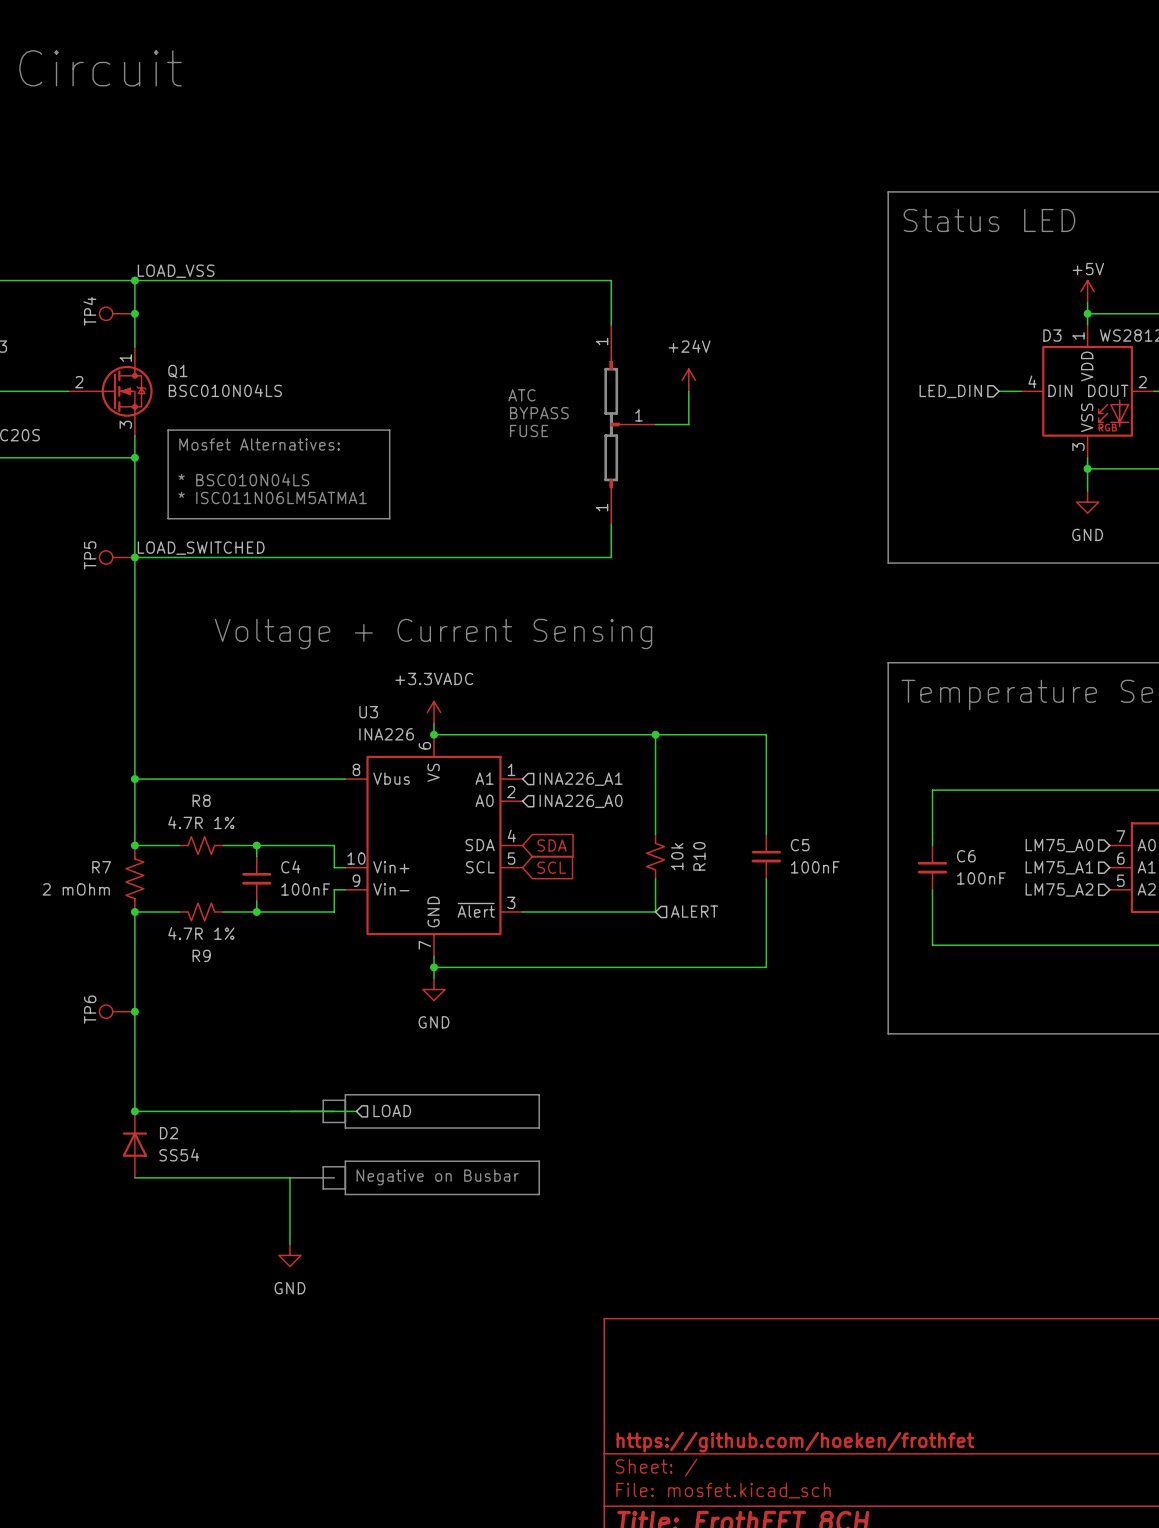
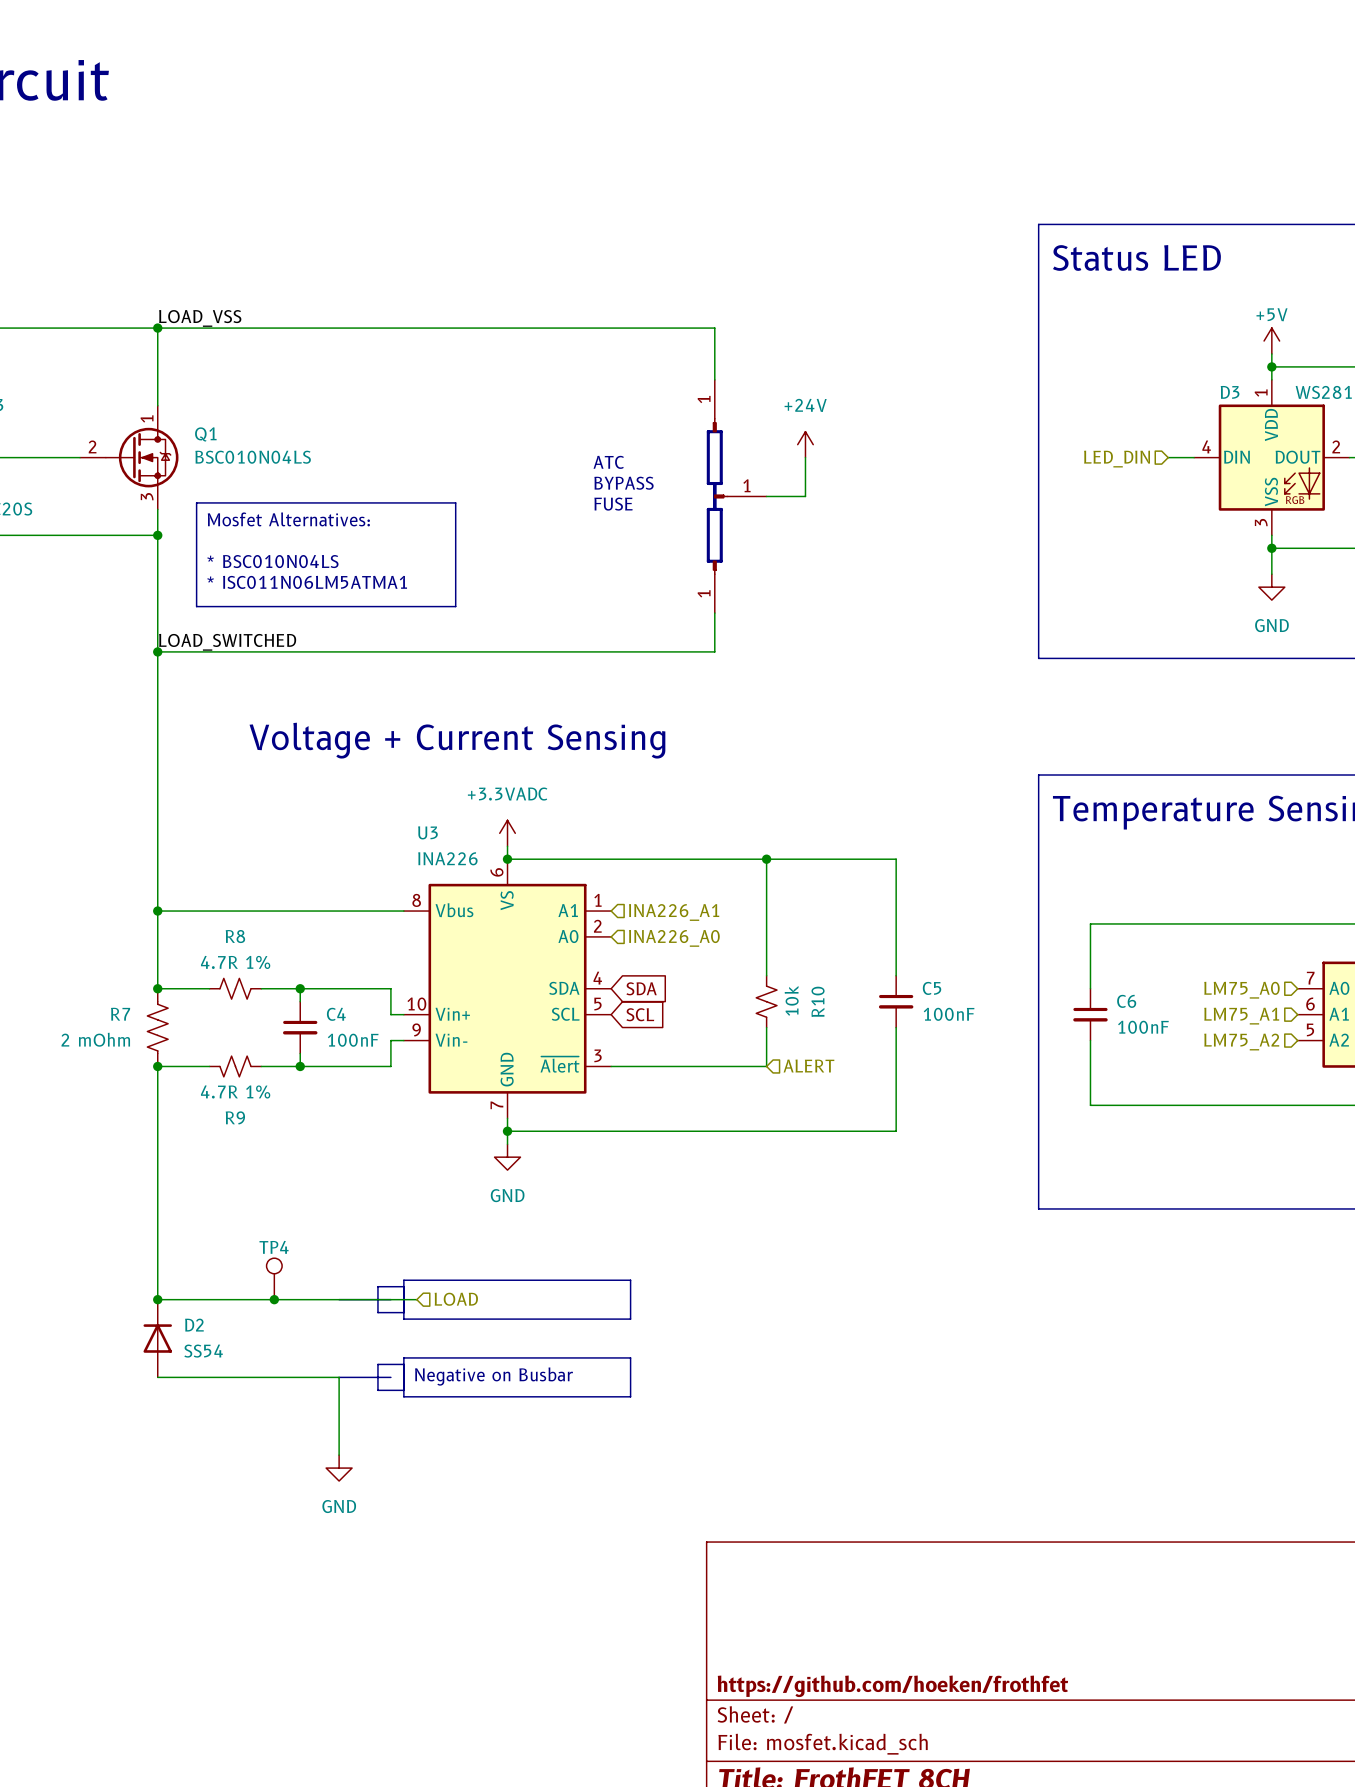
TP4 rotation: 0° (106, 313) -> 90° clockwise (274, 1265)
TP4 position: (117, 313) -> (274, 1278)
junction: (134, 313) -> none
TP5: (117, 557) -> none
TP6: (117, 1011) -> none
junction: (134, 1011) -> none
junction: none -> (274, 1299)

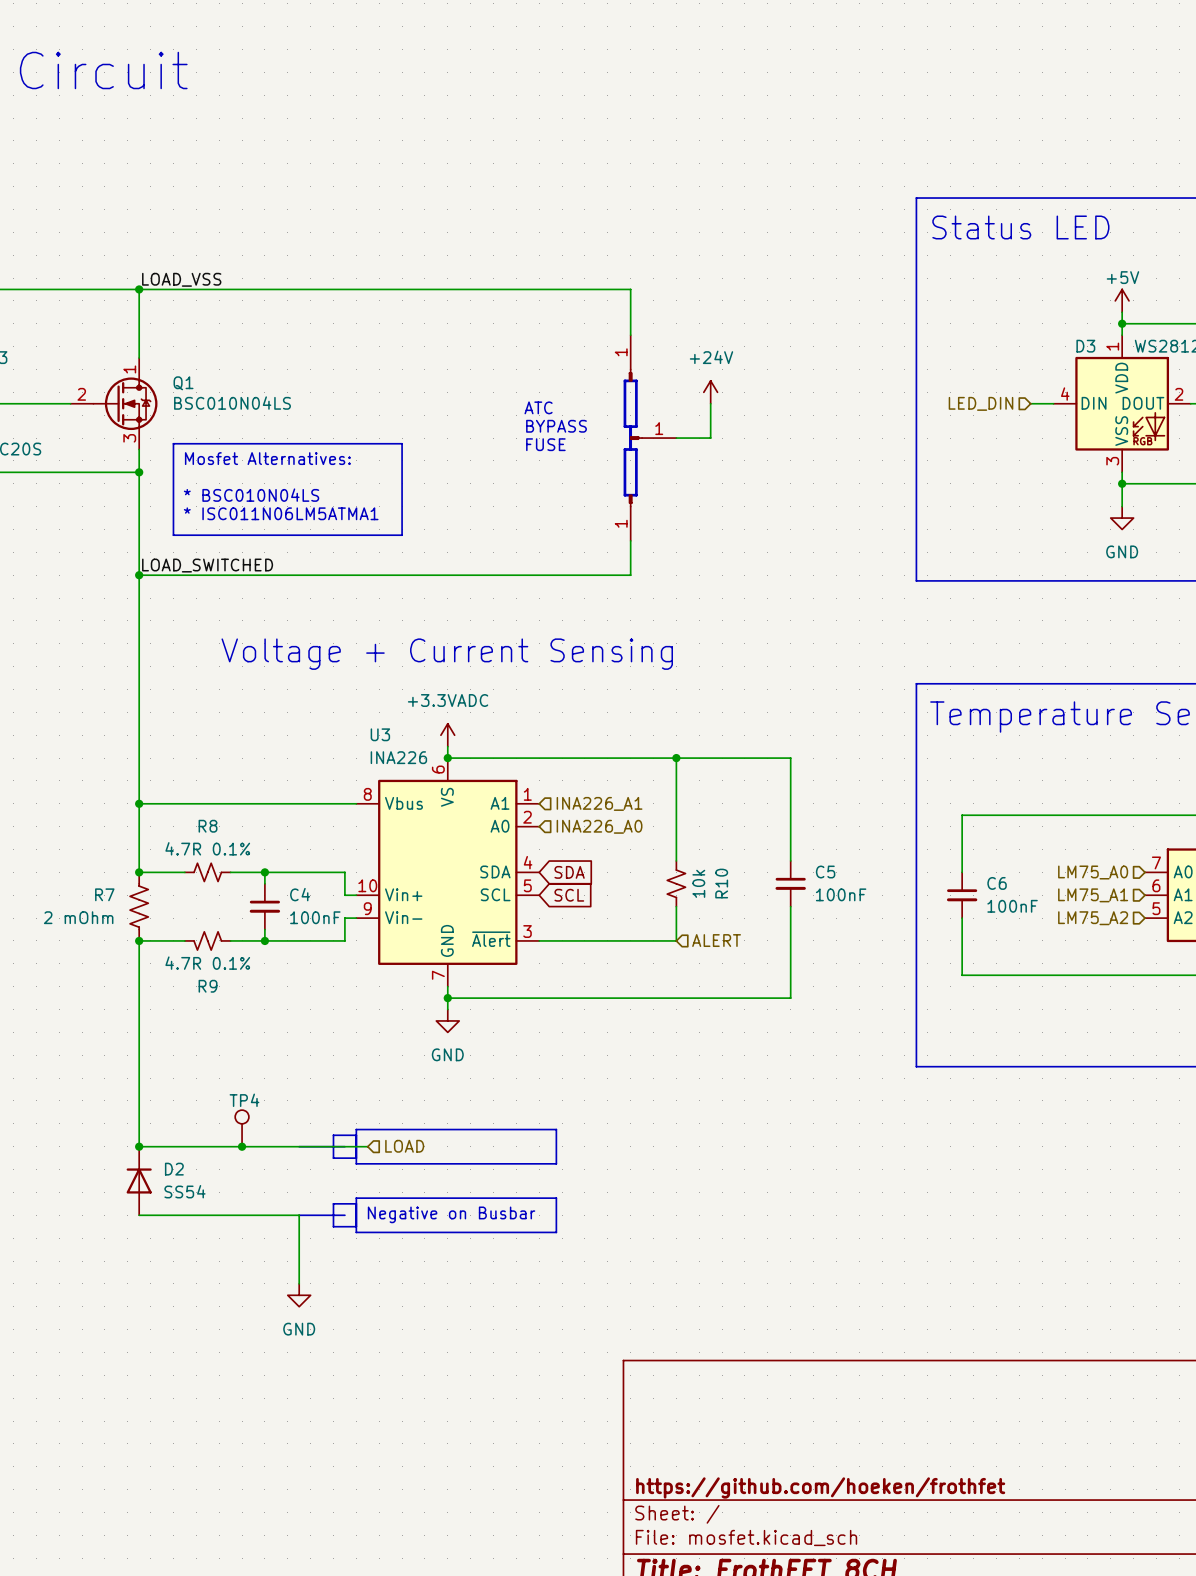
R8 value: 4.7R 1% (235, 962) -> 4.7R 0.1% (207, 848)
R9 value: 4.7R 1% (235, 1091) -> 4.7R 0.1% (207, 963)

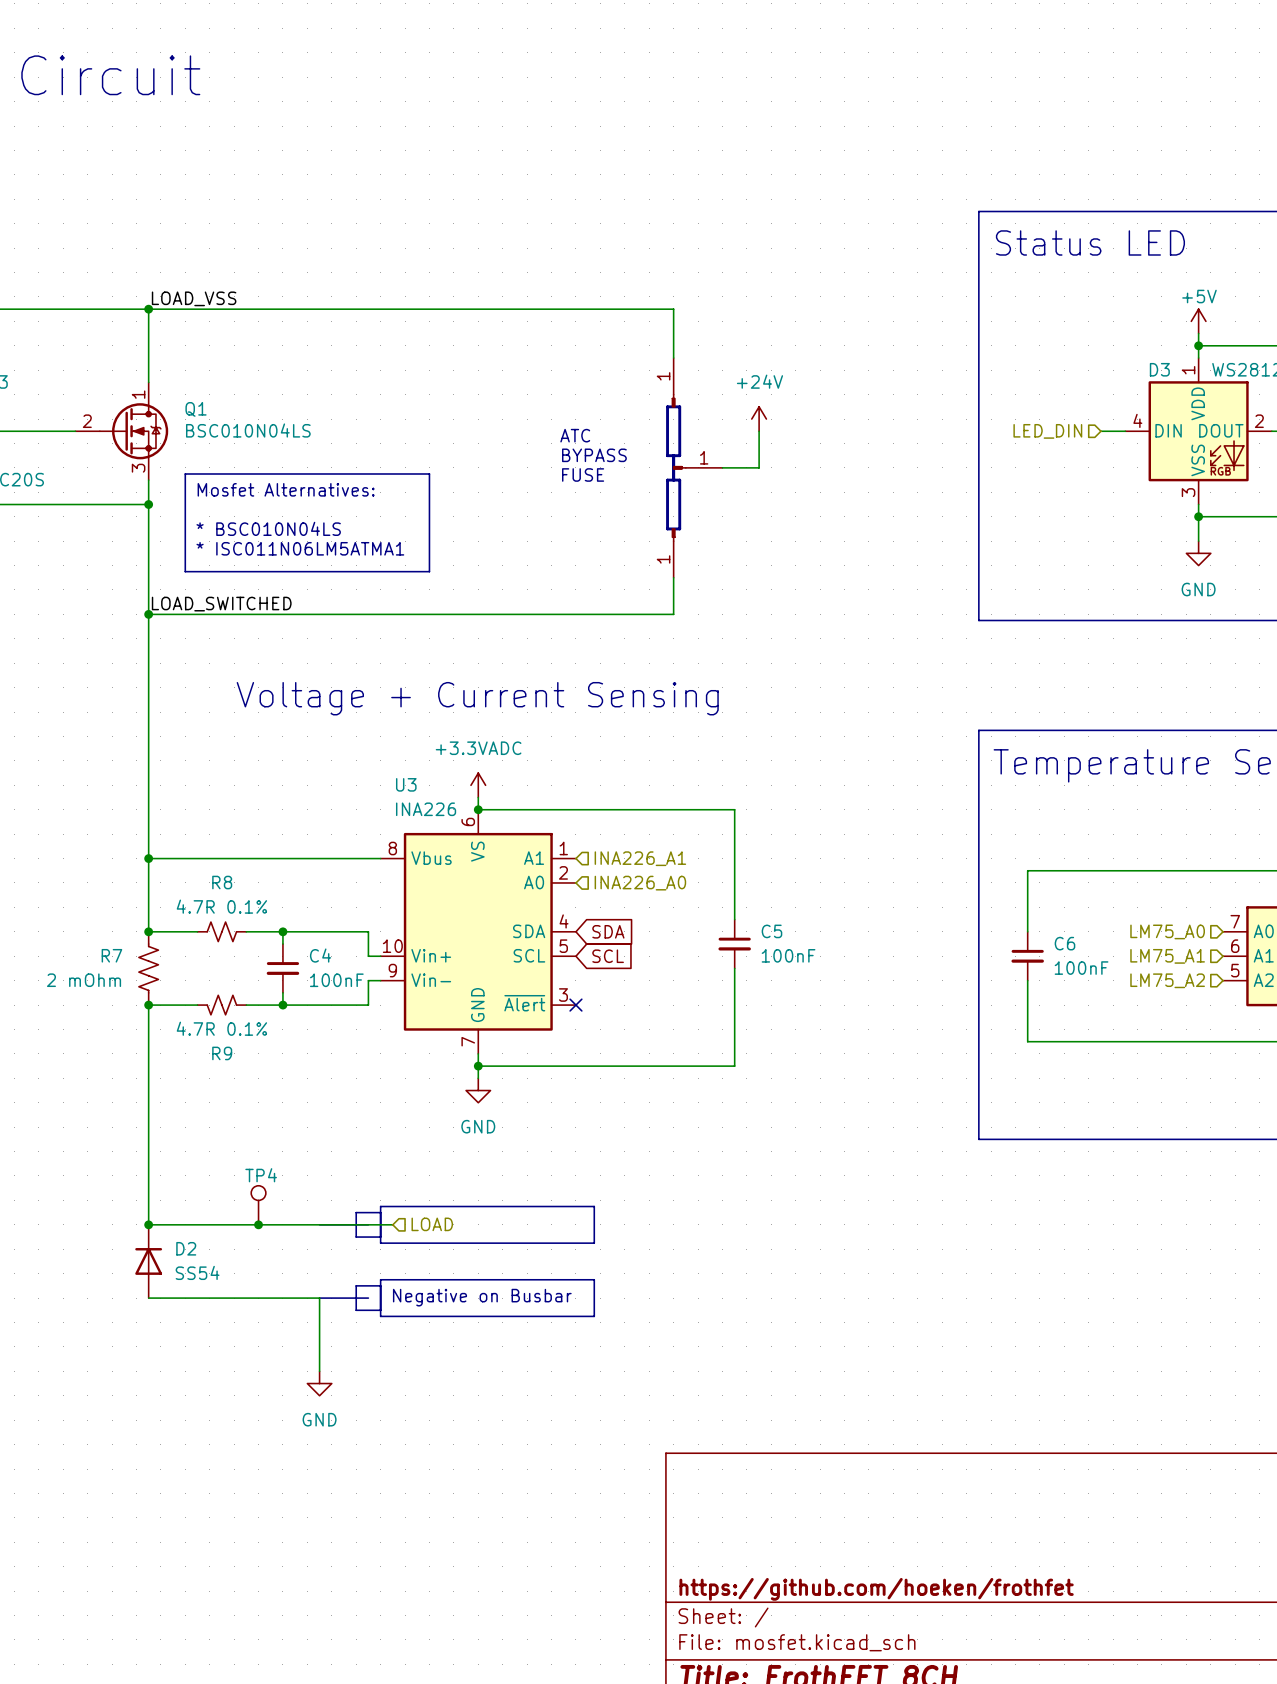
wire: (676, 758) (676, 860) -> none
junction: (676, 758) -> none
wire: (687, 758) (790, 758) (790, 860) -> (734, 809) (734, 919)
R10: 10k (676, 883) -> none
C5 position: (790, 883) -> (734, 944)
wire: (676, 906) (676, 940) (539, 940) -> none
wire: (790, 906) (790, 998) (687, 998) -> (734, 968) (734, 1066)
no-connect mark: none -> (575, 1005)
hierarchical label: ALERT (716, 940) -> none

